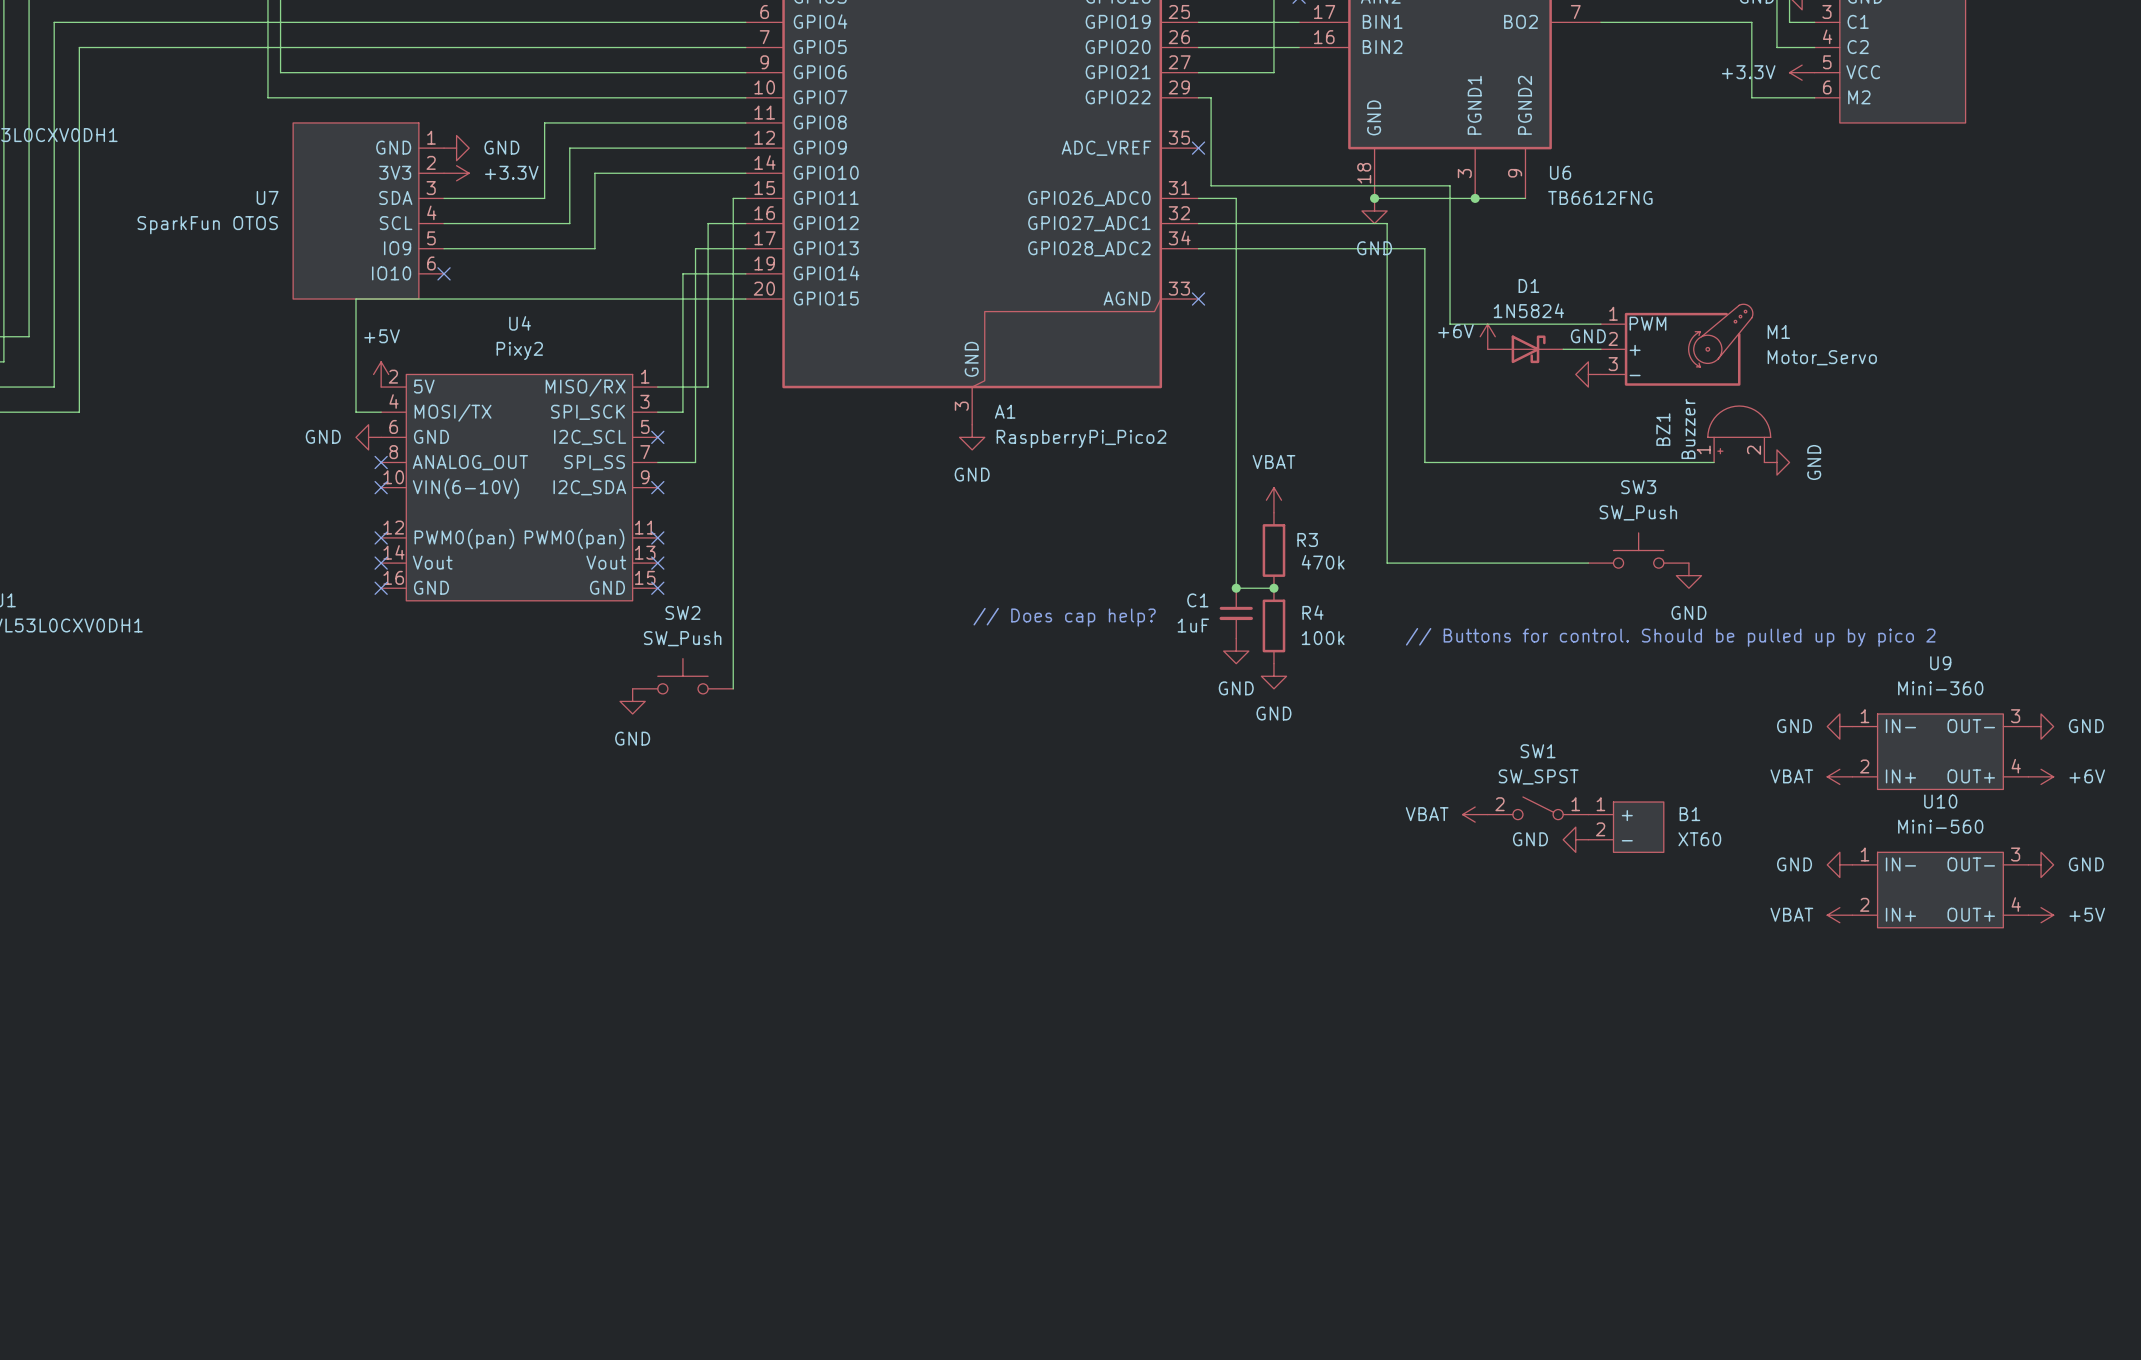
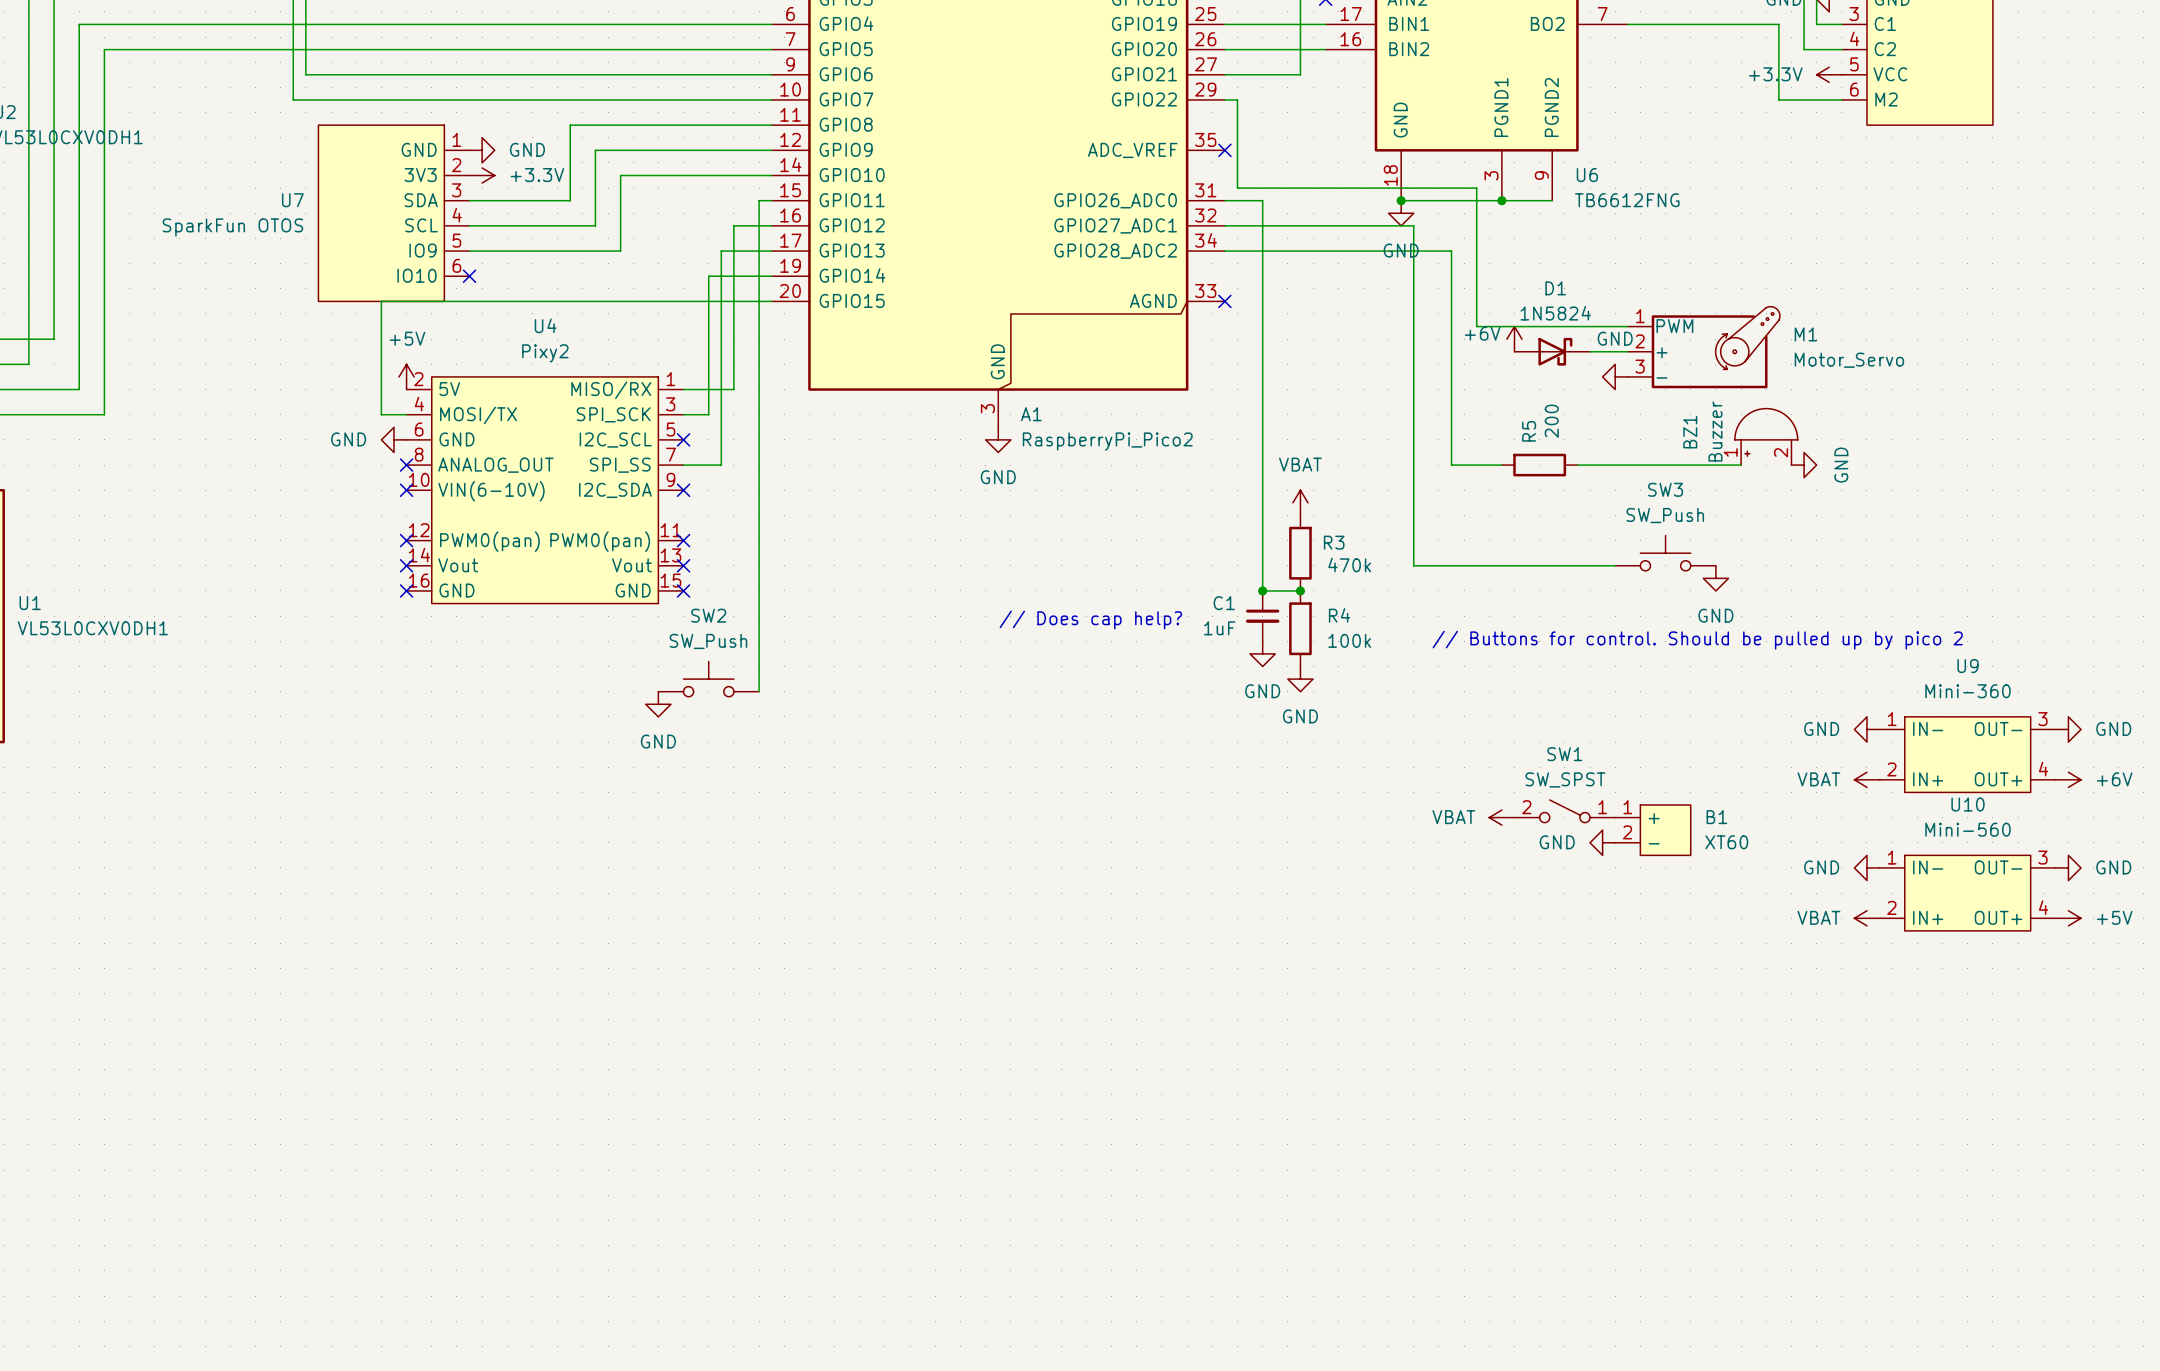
wire: (1475, 462) (1550, 462) -> none
R5: none -> 200 (1539, 465)

